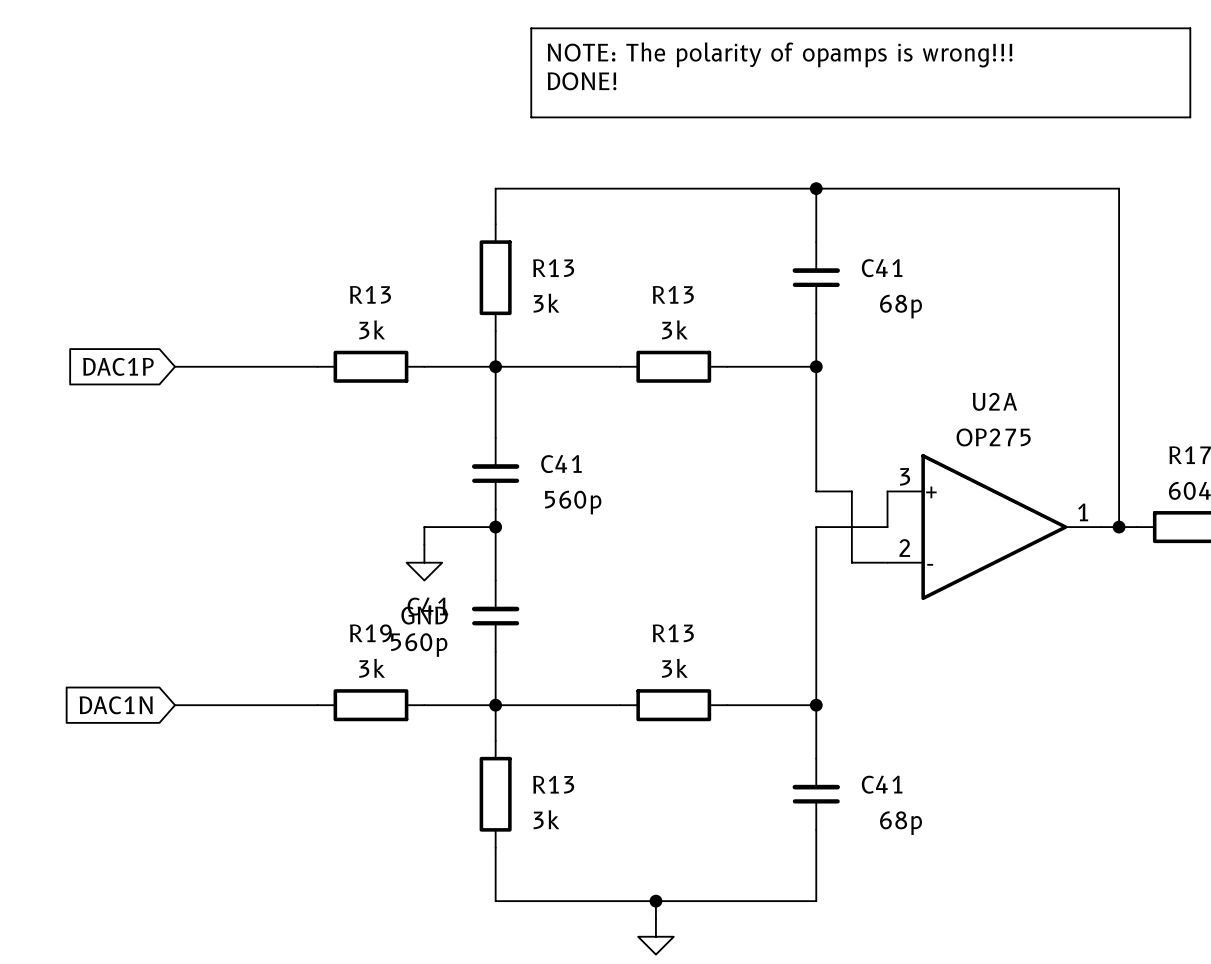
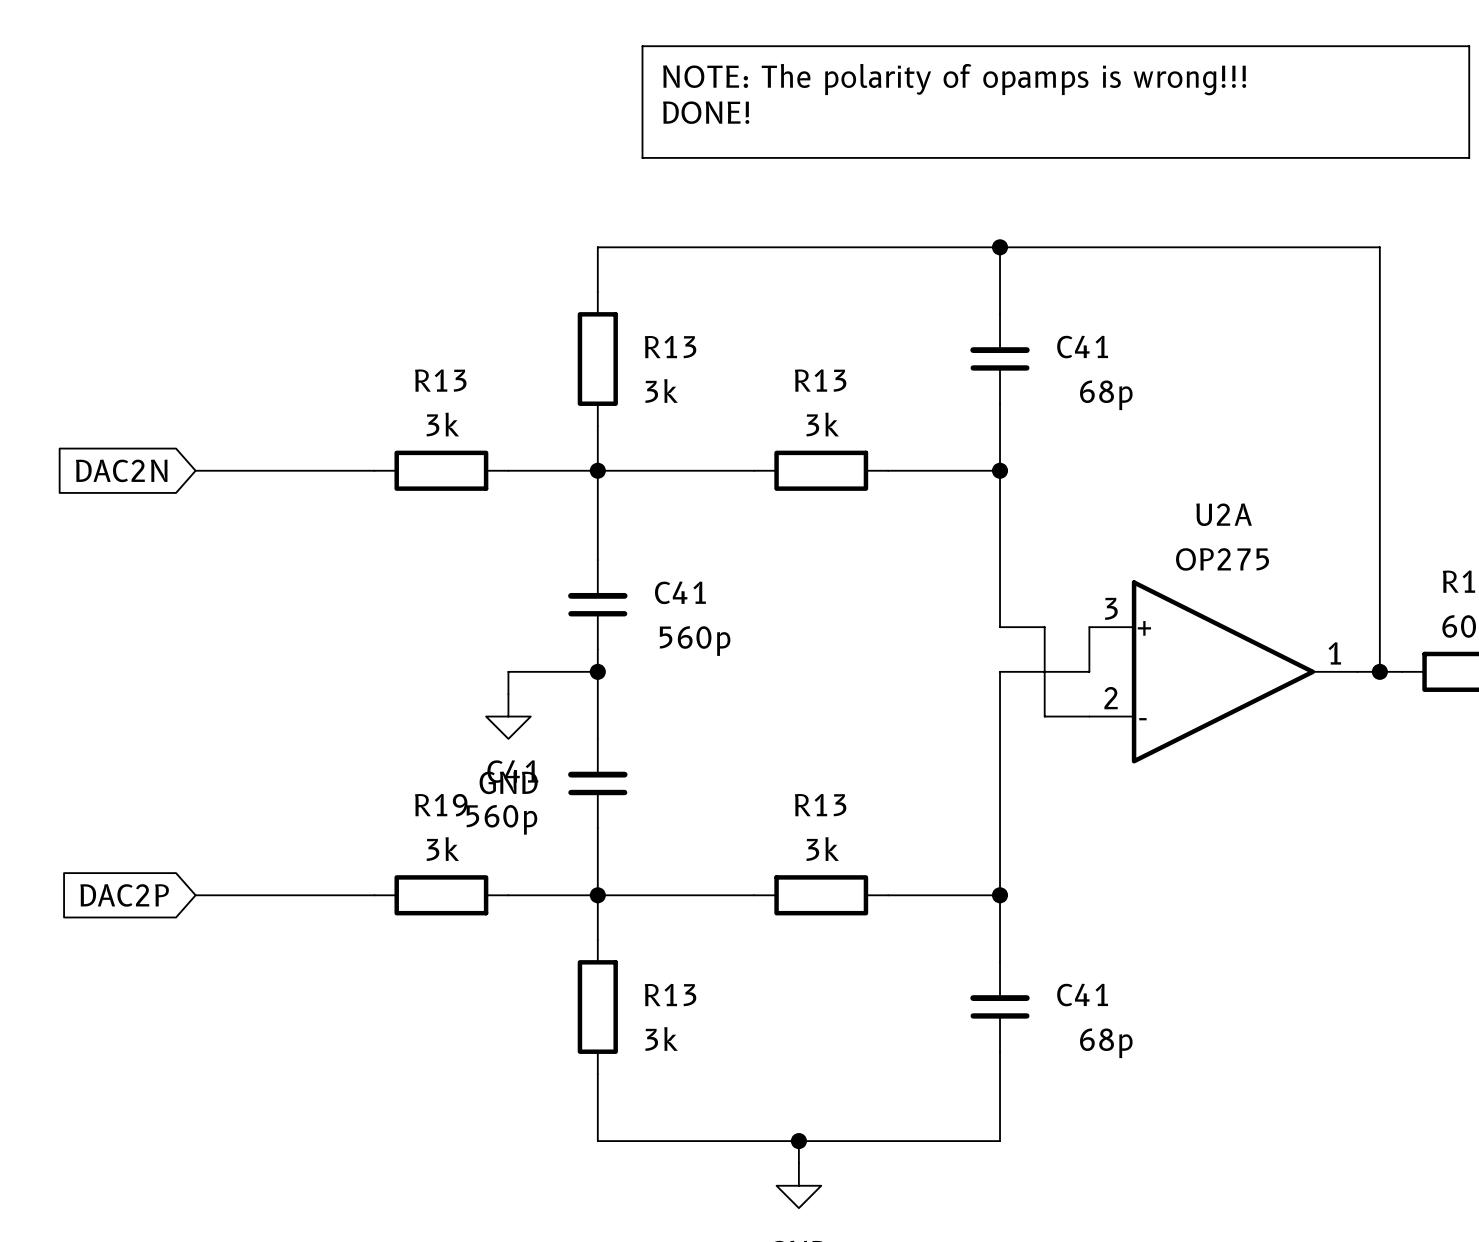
global label: DAC1P (118, 366) -> DAC2N (121, 470)
global label: DAC1N (116, 705) -> DAC2P (124, 895)

